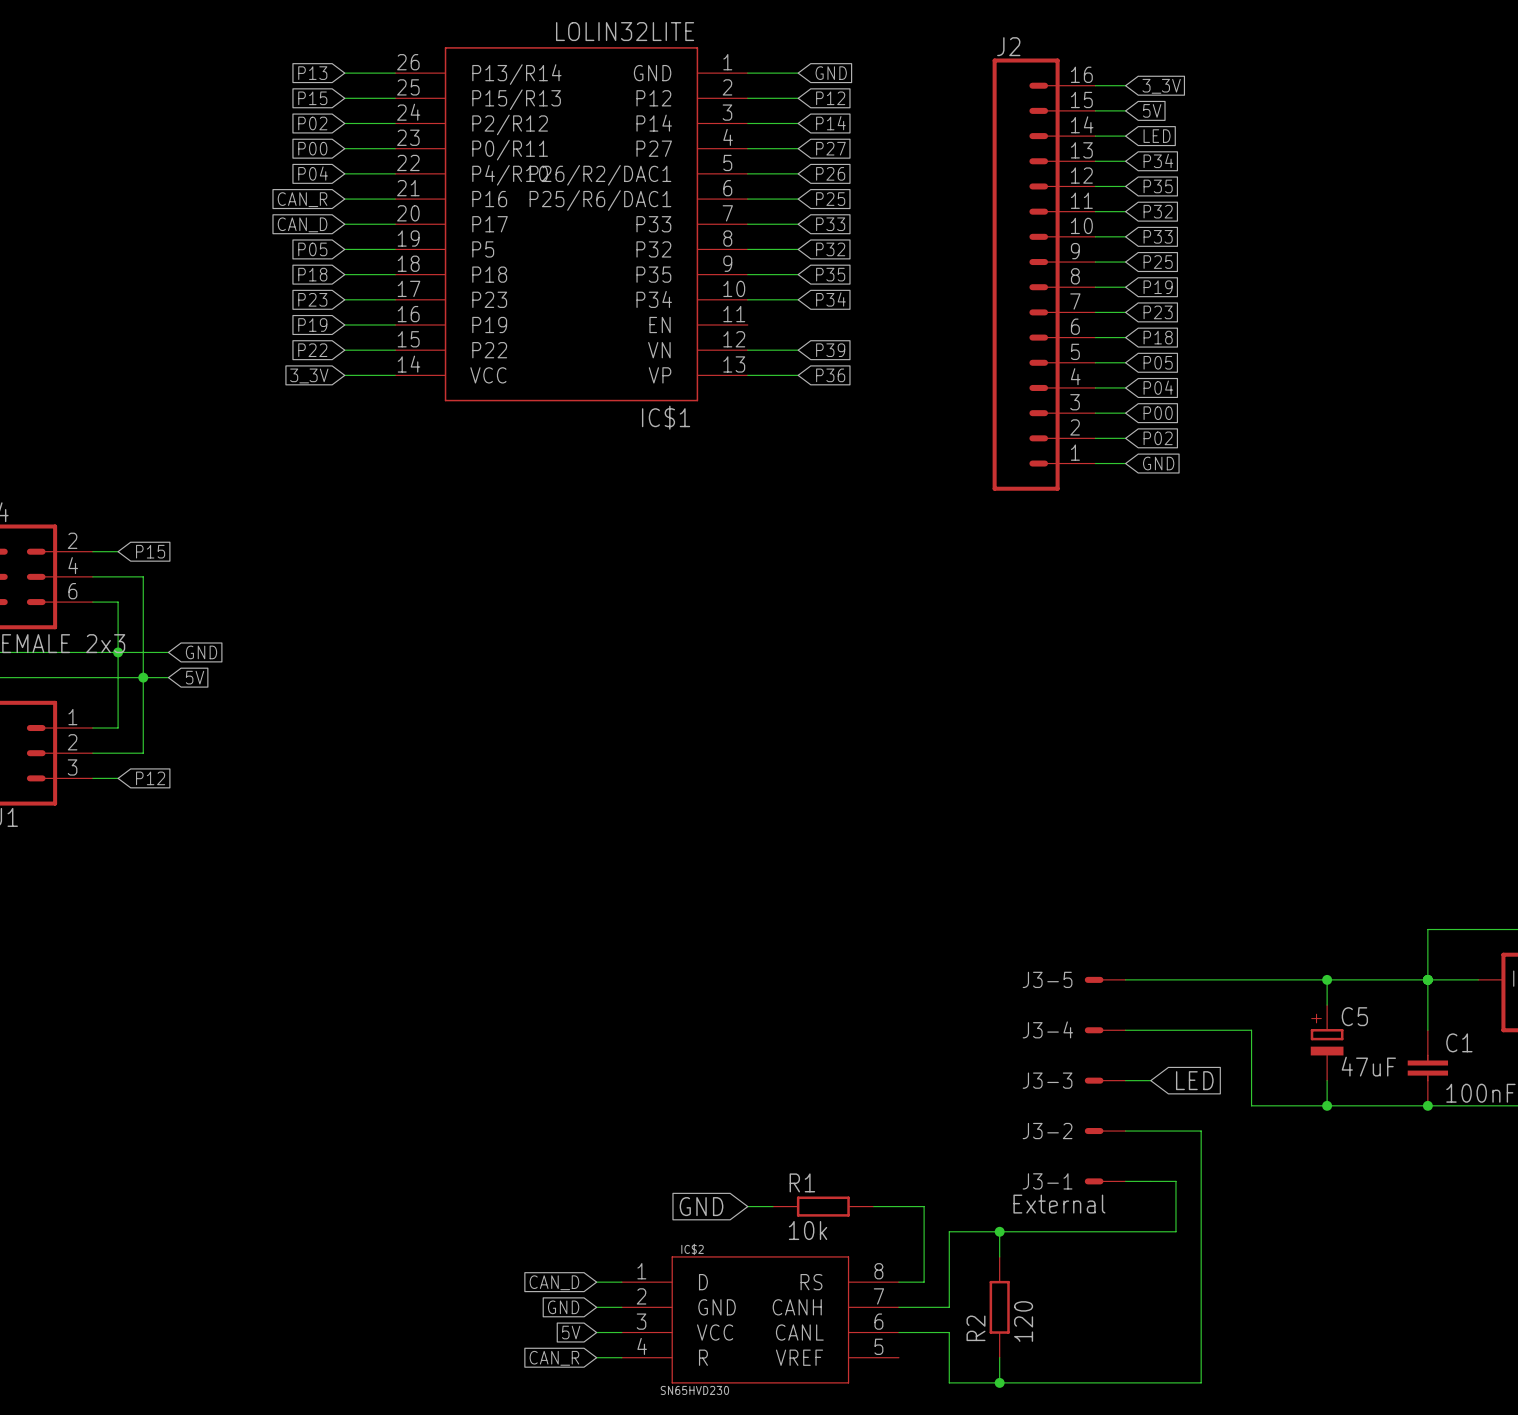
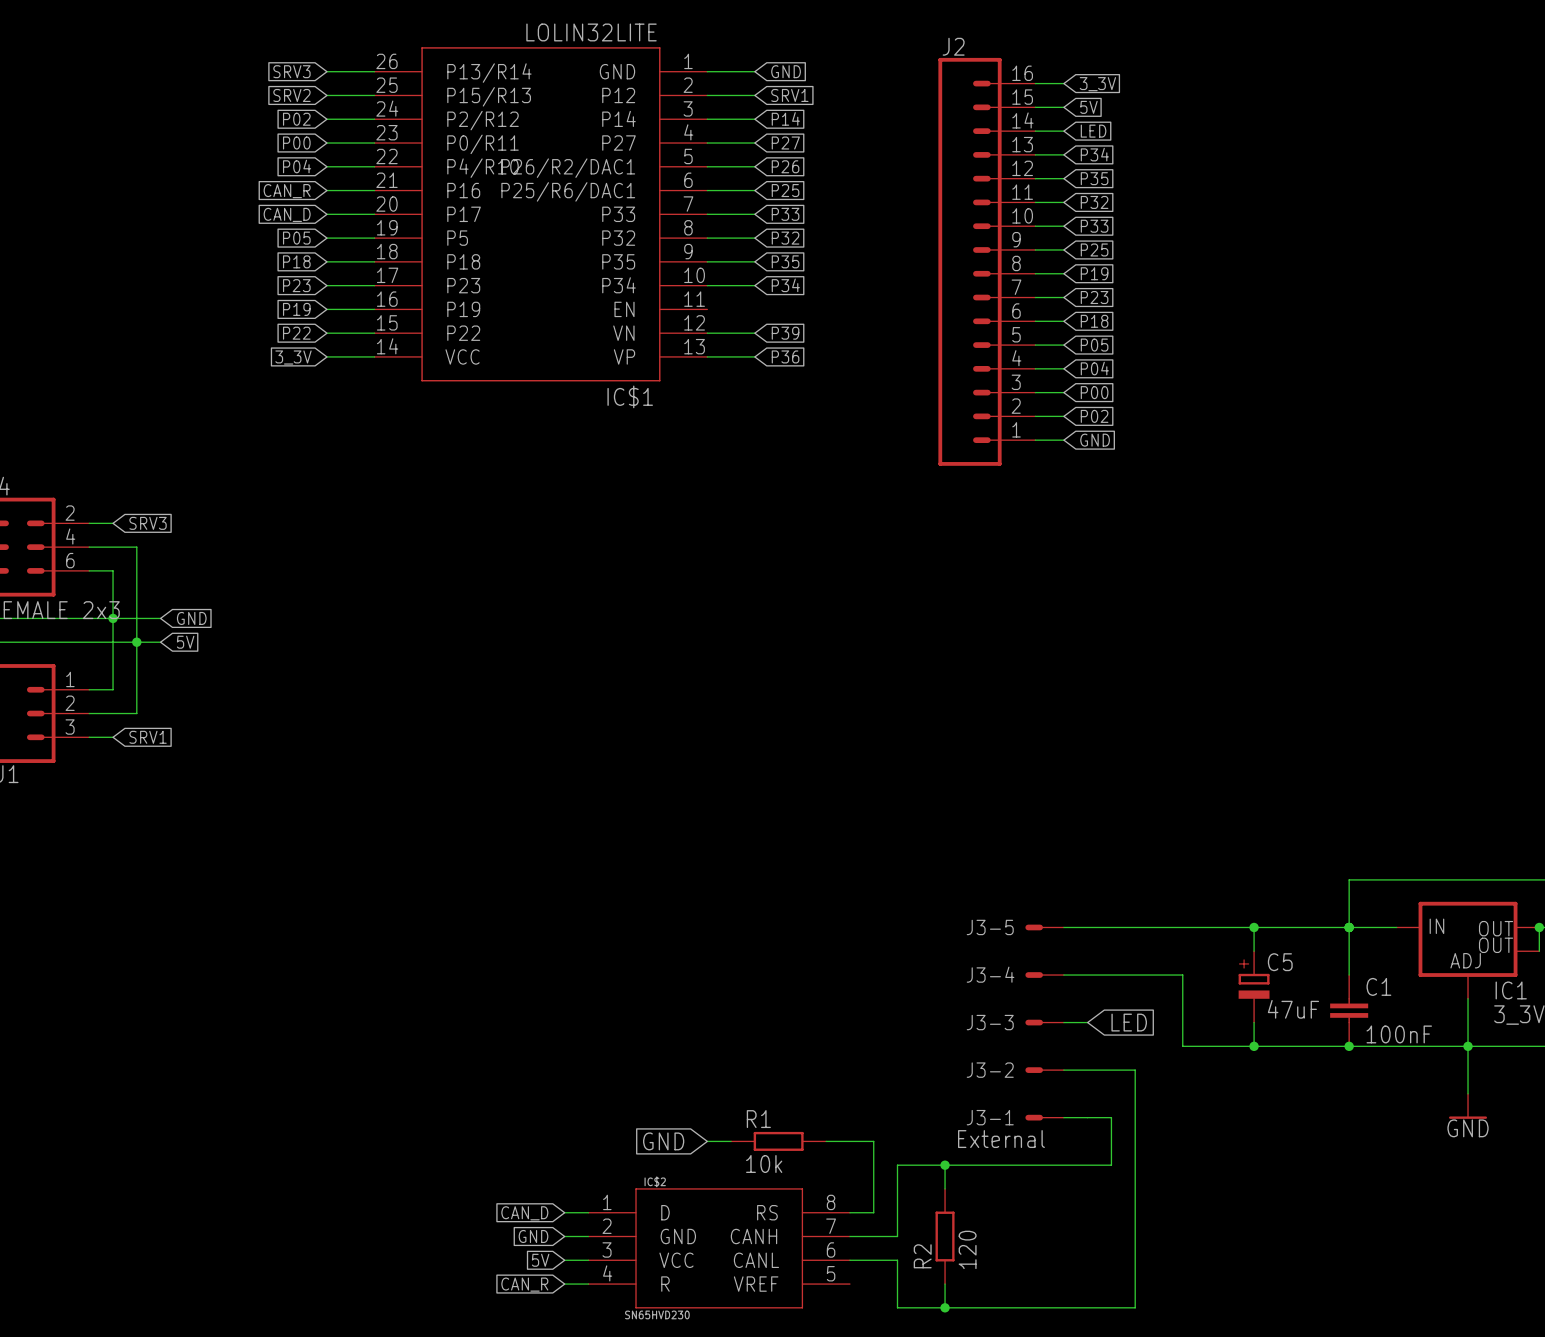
global label: P13 (312, 73) -> SRV3 (291, 71)
global label: P15 (312, 98) -> SRV2 (291, 95)
global label: P12 (830, 98) -> SRV1 (789, 95)
global label: P15 (150, 551) -> SRV3 (148, 523)
global label: P12 (150, 778) -> SRV1 (148, 737)

